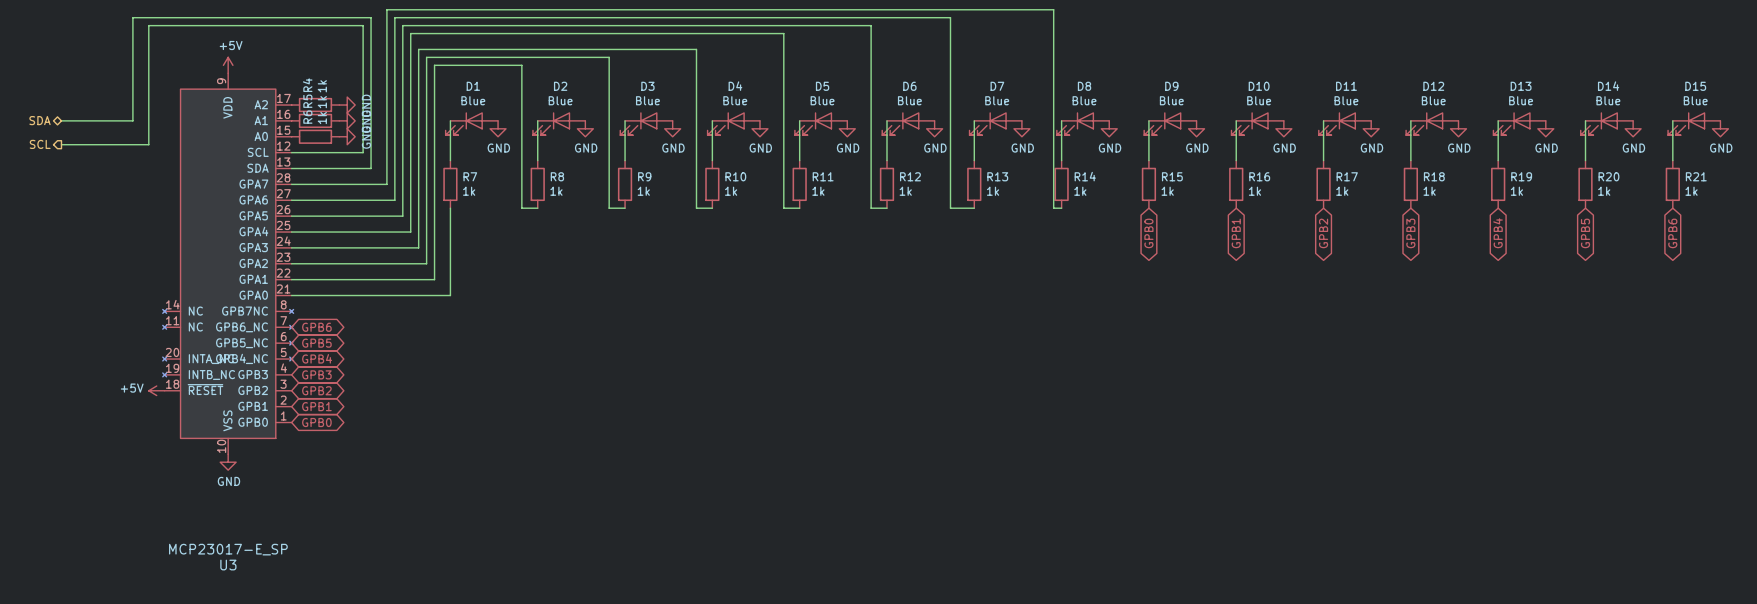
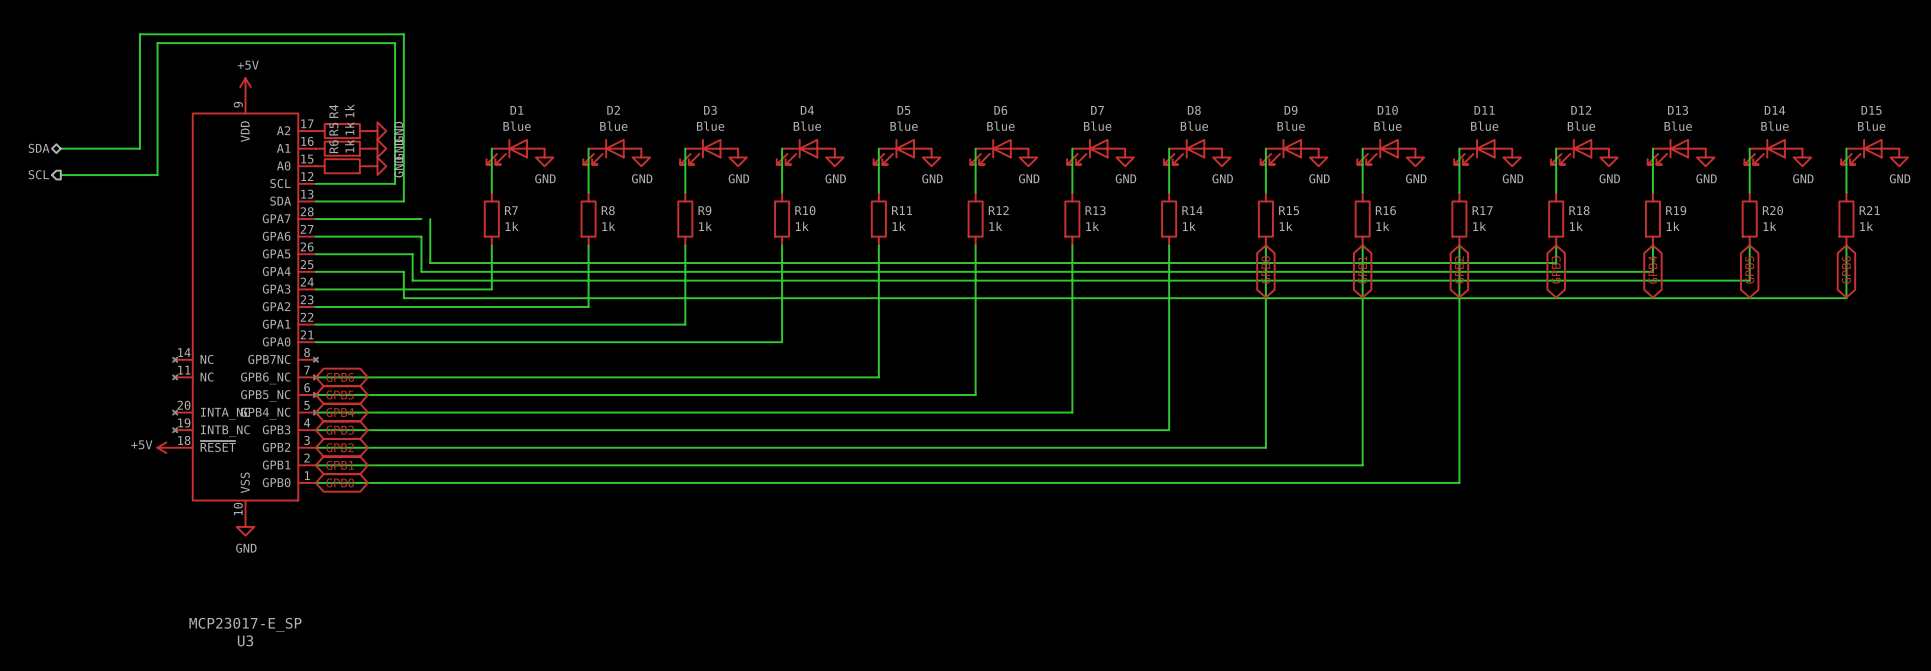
wire: (386, 184) (386, 9) (1053, 9) (1053, 208) (1061, 208) -> (315, 430) (1169, 430) (1169, 245)
wire: (394, 184) (394, 17) (950, 17) (950, 208) (974, 208) -> (315, 412) (1072, 412) (1072, 245)
wire: (386, 200) (394, 200) -> (421, 236) (421, 271)
wire: none -> (430, 236) (430, 263) (1556, 263) (1556, 245)
wire: (537, 208) (521, 208) (521, 65) (434, 65) (434, 279) -> (588, 245) (588, 307) (465, 307)
wire: (625, 208) (609, 208) (609, 57) (426, 57) (426, 263) -> (685, 245) (685, 324) (474, 324)
wire: (712, 208) (696, 208) (696, 49) (418, 49) (418, 247) -> (782, 245) (782, 342) (491, 342)
wire: (799, 208) (783, 208) (783, 33) (410, 33) (410, 232) -> (878, 245) (878, 377) (315, 377)
wire: (886, 208) (871, 208) (871, 25) (402, 25) (402, 216) (378, 216) -> (975, 245) (975, 394) (315, 394)
wire: none -> (1265, 245) (1265, 447) (315, 447)
wire: none -> (1362, 245) (1362, 465) (315, 465)
wire: none -> (1459, 245) (1459, 482) (315, 482)
wire: none -> (1652, 245) (1652, 271) (447, 271)
wire: none -> (1749, 245) (1749, 280) (412, 280) (412, 254)
wire: (371, 232) (386, 232) -> (403, 271) (403, 298) (1846, 298) (1846, 245)
wire: (450, 247) (450, 295) -> (491, 289) (456, 289)

